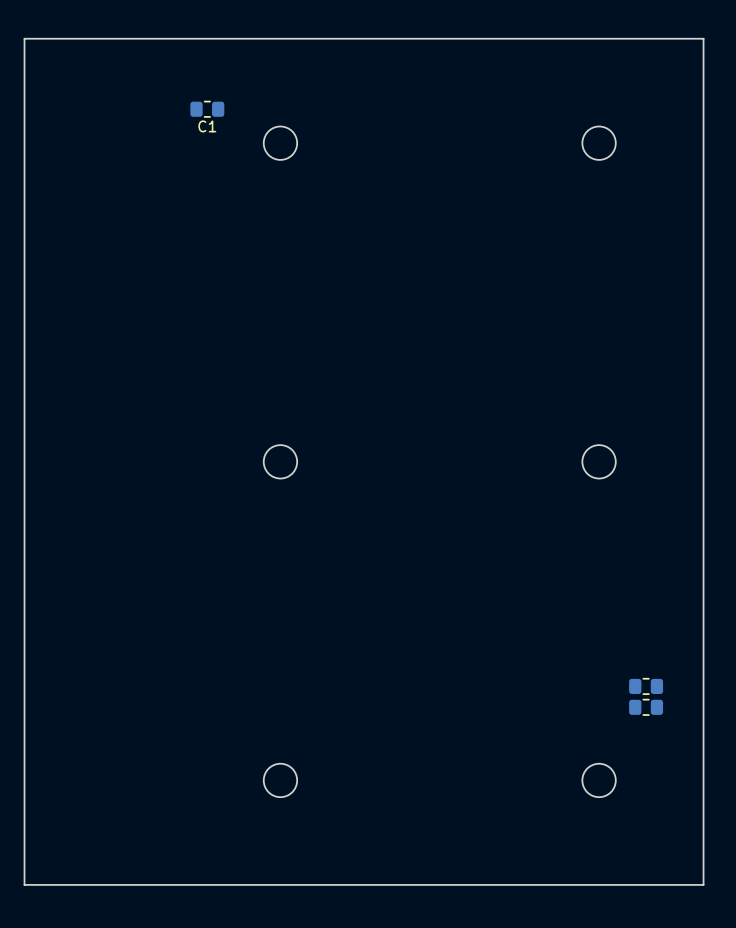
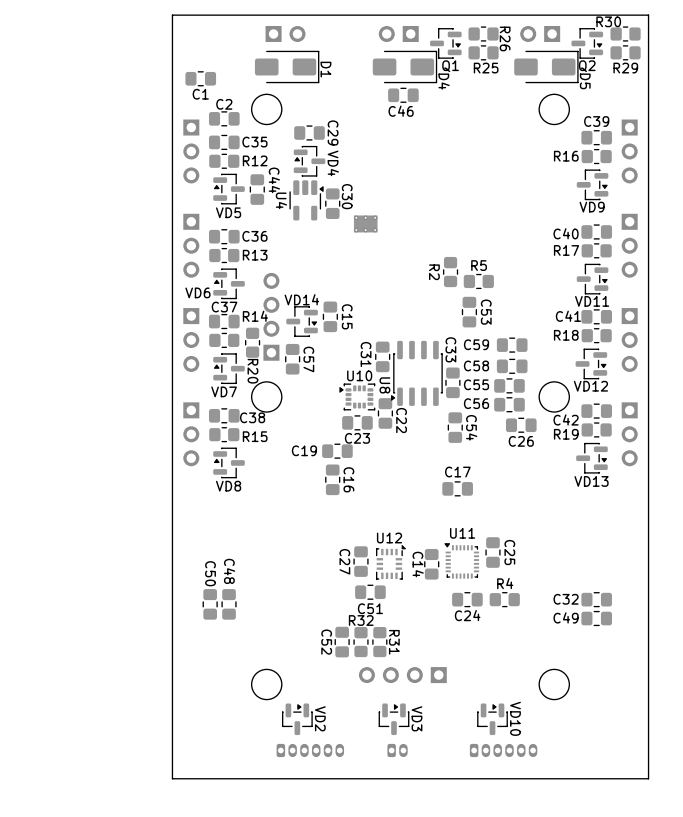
board edge: (175, 38) (24, 38) (24, 884) (175, 884) -> (172, 15) (172, 778)
part: none -> (285, 34)
part: none -> (398, 34)
R26: none -> (483, 34)
part: none -> (540, 34)
R30: none -> (625, 34)
Q1: none -> (445, 43)
Q2: none -> (587, 43)
R25: none -> (483, 52)
R29: none -> (625, 52)
D1: none -> (287, 66)
D4: none -> (404, 66)
D5: none -> (546, 66)
C46: none -> (403, 95)
C2: none -> (224, 118)
C29: none -> (309, 132)
C39: none -> (596, 137)
C35: none -> (224, 142)
part: none -> (191, 151)
part: none -> (629, 151)
R16: none -> (596, 156)
R12: none -> (224, 161)
VD4: none -> (309, 161)
VD9: none -> (592, 184)
VD5: none -> (229, 189)
C44: none -> (257, 189)
U4: none -> (306, 200)
C30: none -> (332, 203)
part: none -> (365, 223)
C40: none -> (596, 231)
C36: none -> (224, 236)
part: none -> (191, 245)
part: none -> (629, 245)
R17: none -> (596, 250)
R13: none -> (224, 255)
R2: none -> (450, 272)
VD11: none -> (592, 279)
R5: none -> (478, 281)
VD6: none -> (229, 283)
C53: none -> (469, 312)
part: none -> (271, 316)
C15: none -> (330, 316)
C41: none -> (596, 316)
C37: none -> (224, 321)
VD14: none -> (302, 321)
R18: none -> (596, 335)
part: none -> (191, 340)
part: none -> (629, 340)
R14: none -> (224, 340)
R20: none -> (252, 342)
C59: none -> (512, 345)
C31: none -> (382, 356)
C57: none -> (292, 359)
VD12: none -> (591, 363)
C58: none -> (512, 366)
VD7: none -> (229, 368)
U8: none -> (416, 373)
C33: none -> (452, 382)
C55: none -> (509, 385)
U10: none -> (357, 396)
C56: none -> (509, 404)
C42: none -> (596, 411)
C22: none -> (385, 413)
C38: none -> (224, 415)
C23: none -> (357, 422)
C26: none -> (521, 425)
C54: none -> (455, 427)
R19: none -> (596, 429)
part: none -> (191, 434)
R15: none -> (224, 434)
part: none -> (629, 434)
C19: none -> (337, 451)
VD13: none -> (591, 458)
VD8: none -> (229, 462)
C16: none -> (332, 479)
C17: none -> (457, 488)
C25: none -> (492, 552)
U11: none -> (461, 560)
C27: none -> (361, 561)
U12: none -> (391, 562)
C14: none -> (431, 564)
C51: none -> (370, 592)
C24: none -> (467, 599)
R4: none -> (504, 599)
C32 name: none -> C32 (566, 599)
C50: none -> (210, 604)
C48: none -> (229, 604)
C49 name: none -> C49 (566, 617)
C52: none -> (342, 642)
R32: none -> (361, 642)
R31: none -> (379, 642)
part: none -> (402, 675)
VD2: none -> (297, 719)
VD3: none -> (394, 719)
VD10: none -> (492, 719)
part: none -> (310, 750)
part: none -> (397, 750)
part: none -> (503, 750)

